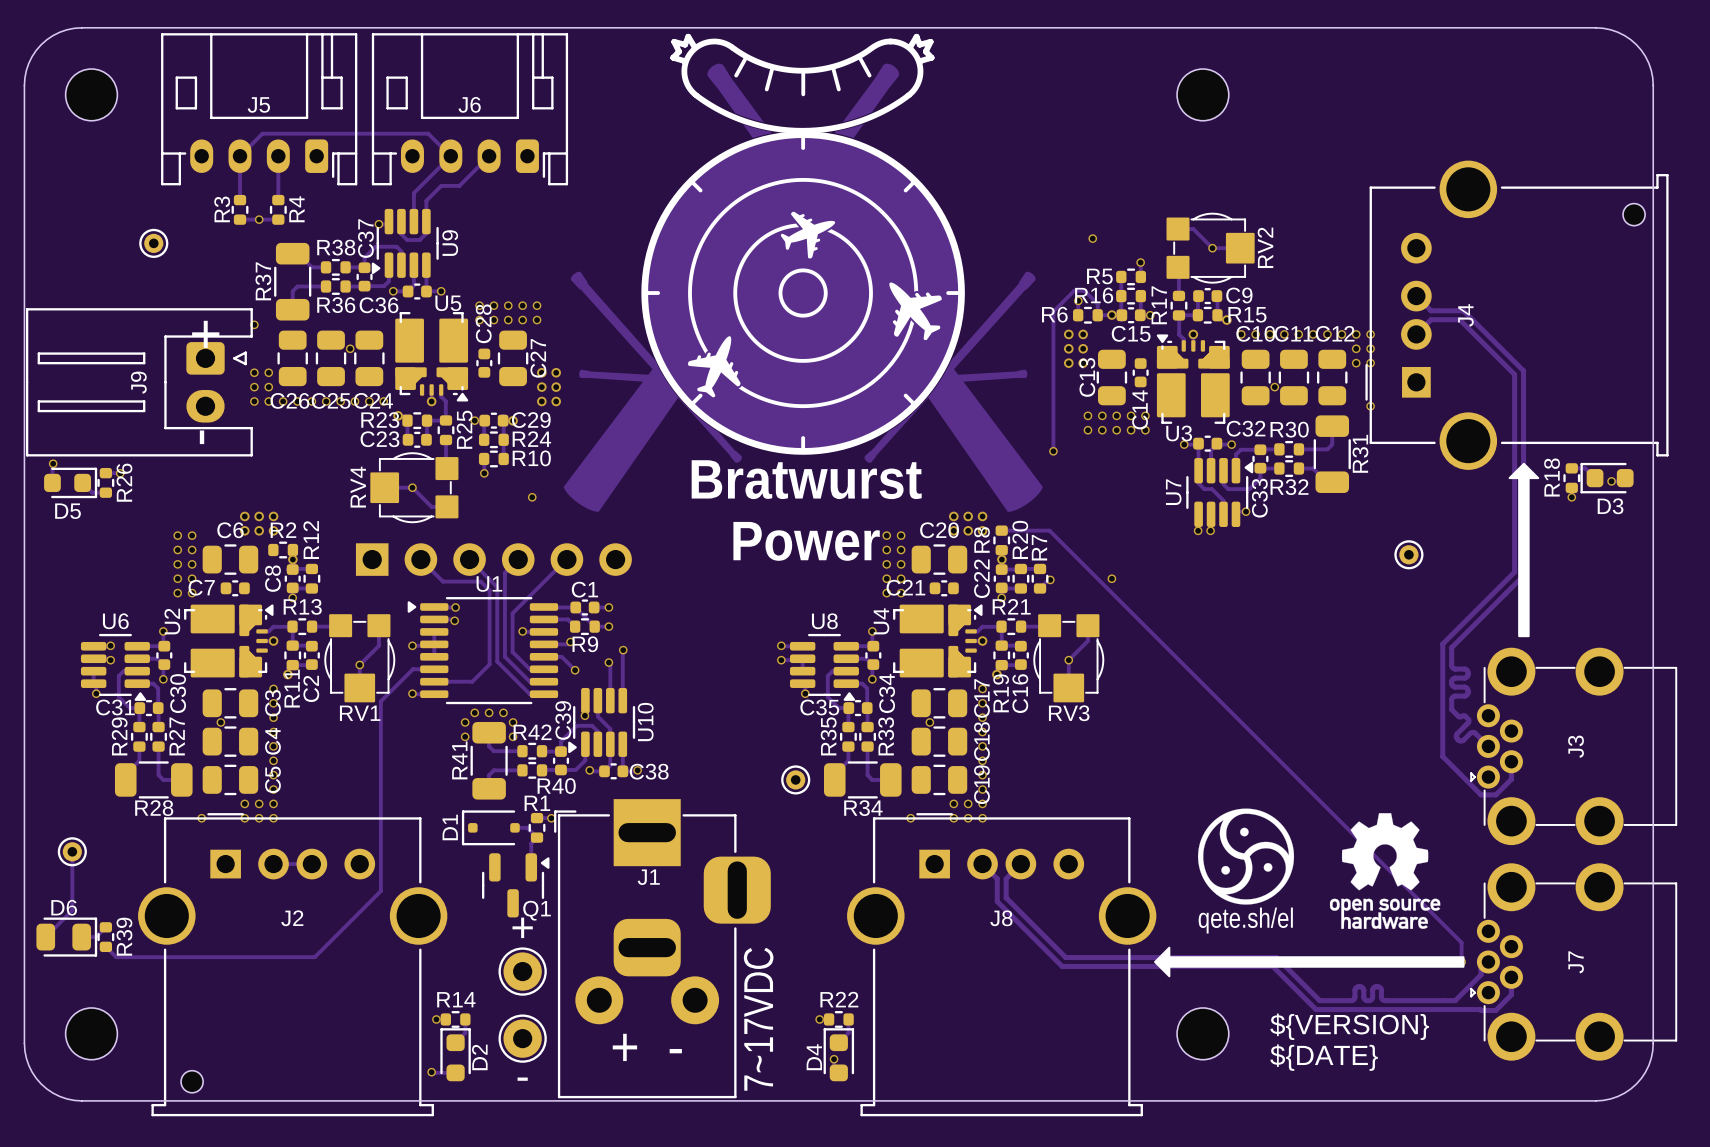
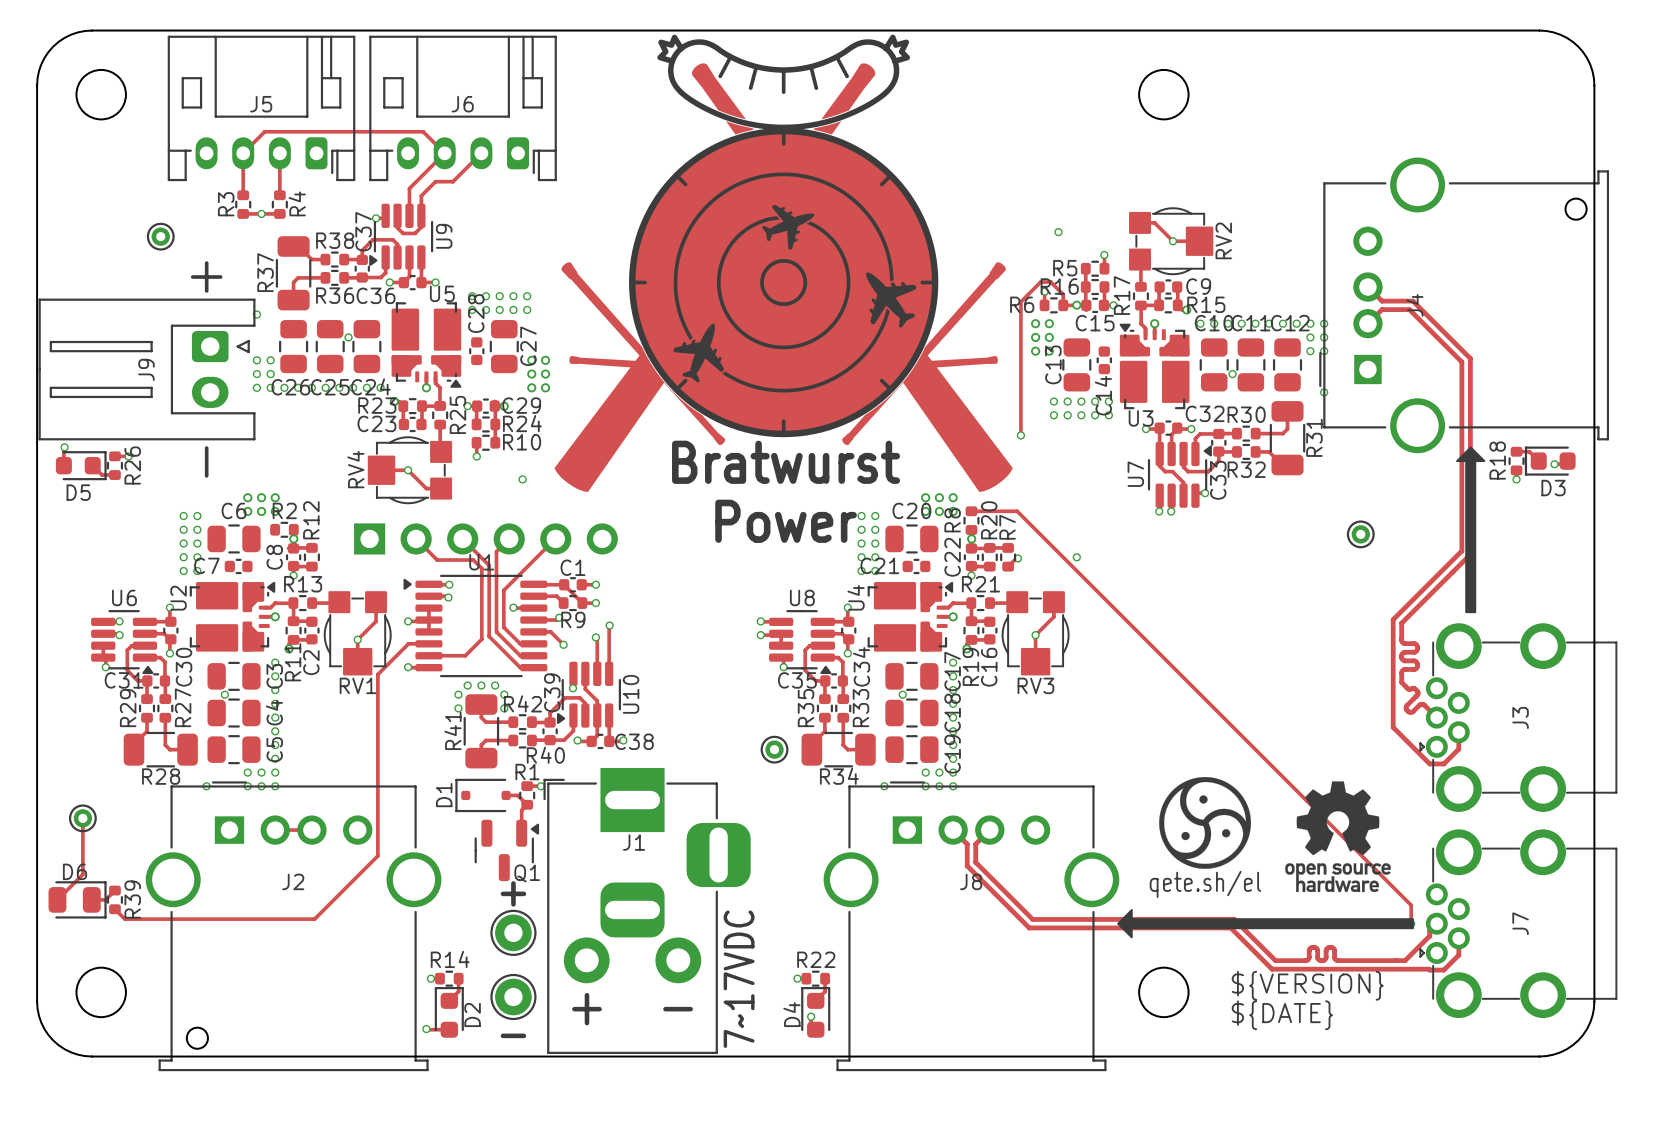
drawing shape: [563, 33, 1043, 512] -> [554, 34, 1013, 492]

